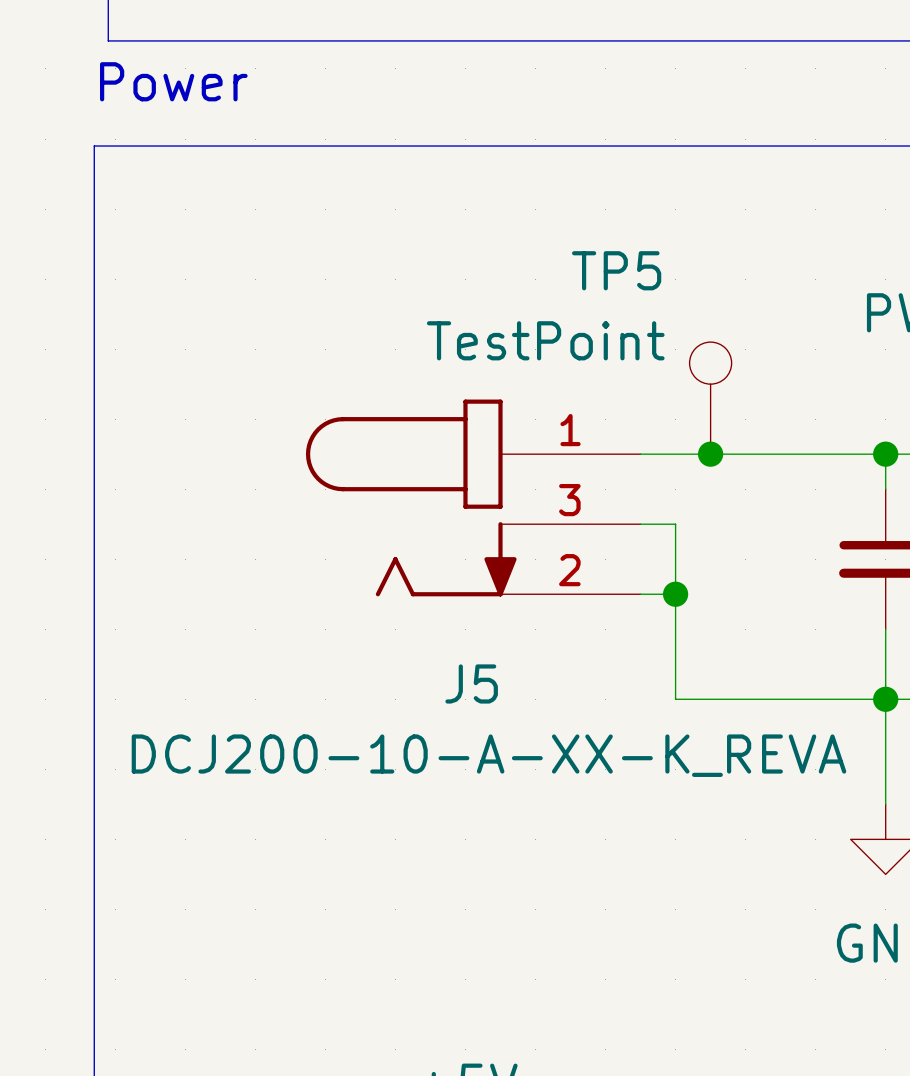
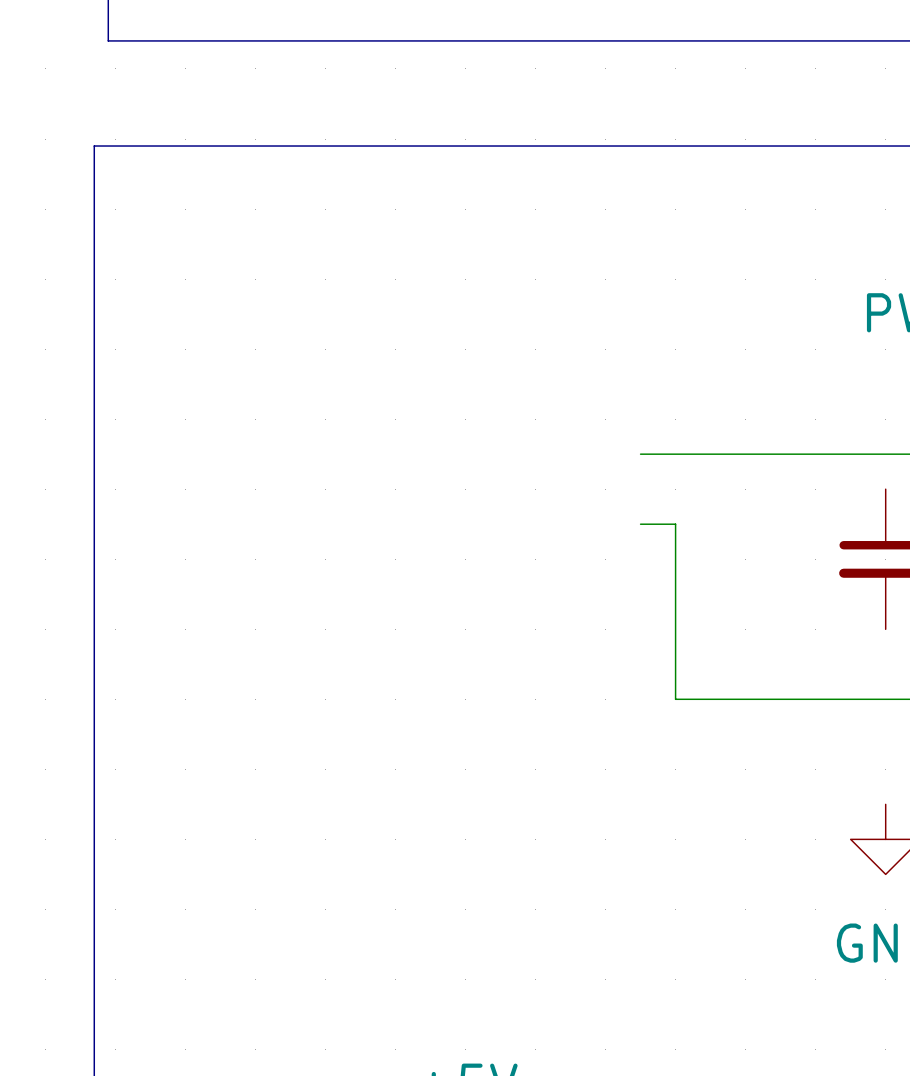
text: Power (173, 81) -> none
TP5: TestPoint (710, 398) -> none
junction: (710, 454) -> none
wire: (885, 454) (885, 489) -> none
junction: (885, 454) -> none
J5: DCJ200-10-A-XX-K_REVA (473, 497) -> none
wire: (640, 594) (675, 594) -> none
junction: (675, 594) -> none
wire: (885, 629) (885, 804) -> none
junction: (885, 699) -> none

